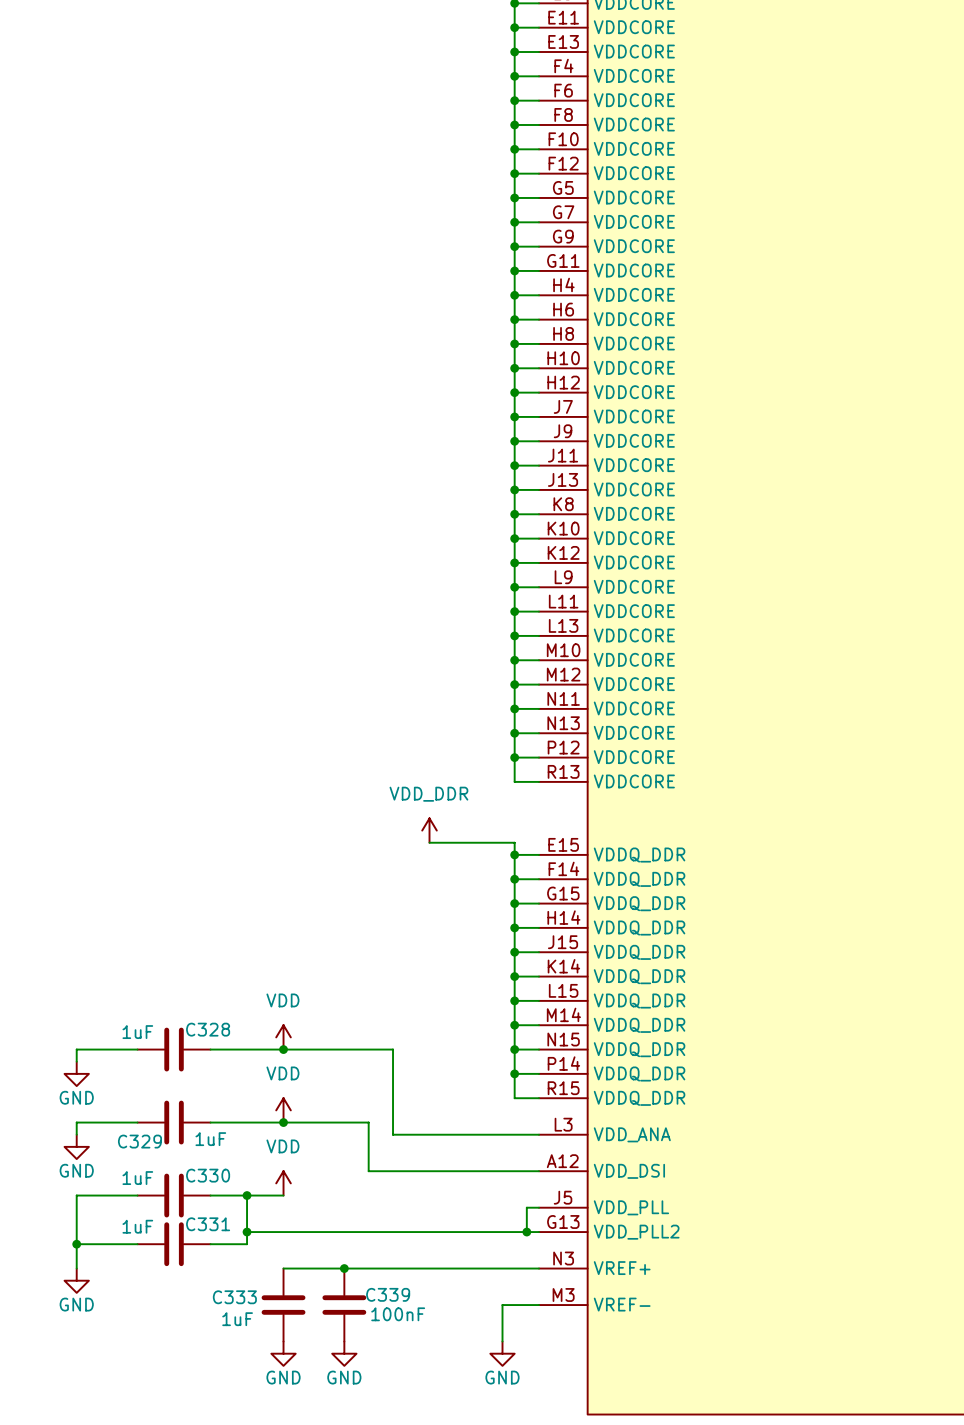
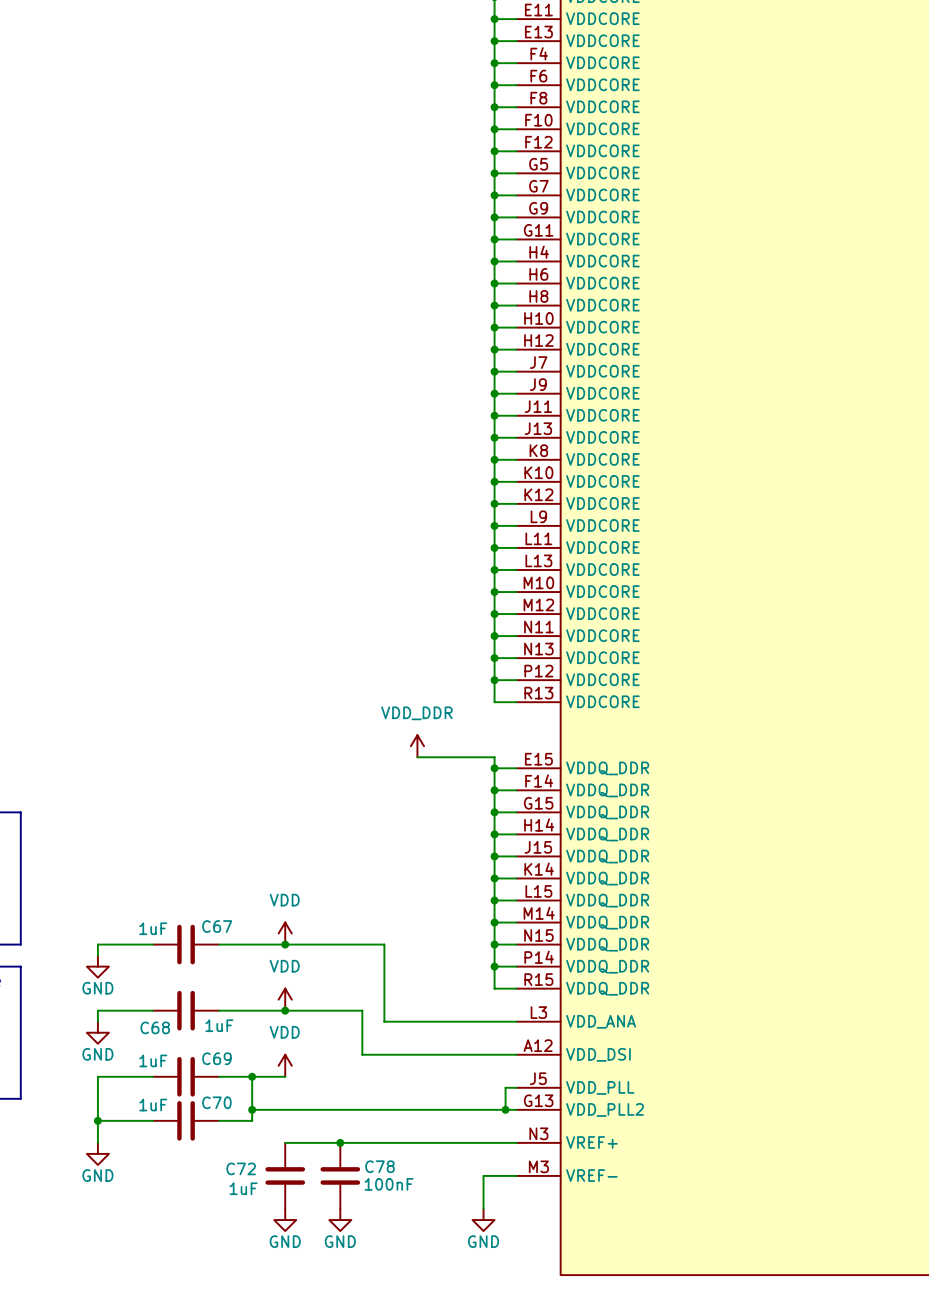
C328 name: C328 (208, 1029) -> C67 (217, 926)
C329 name: C329 (139, 1141) -> C68 (155, 1027)
C330 name: C330 (208, 1175) -> C69 (216, 1058)
C331 name: C331 (208, 1224) -> C70 (216, 1102)
C339 name: C339 (388, 1294) -> C78 (379, 1166)
C333 name: C333 (234, 1297) -> C72 (241, 1168)

